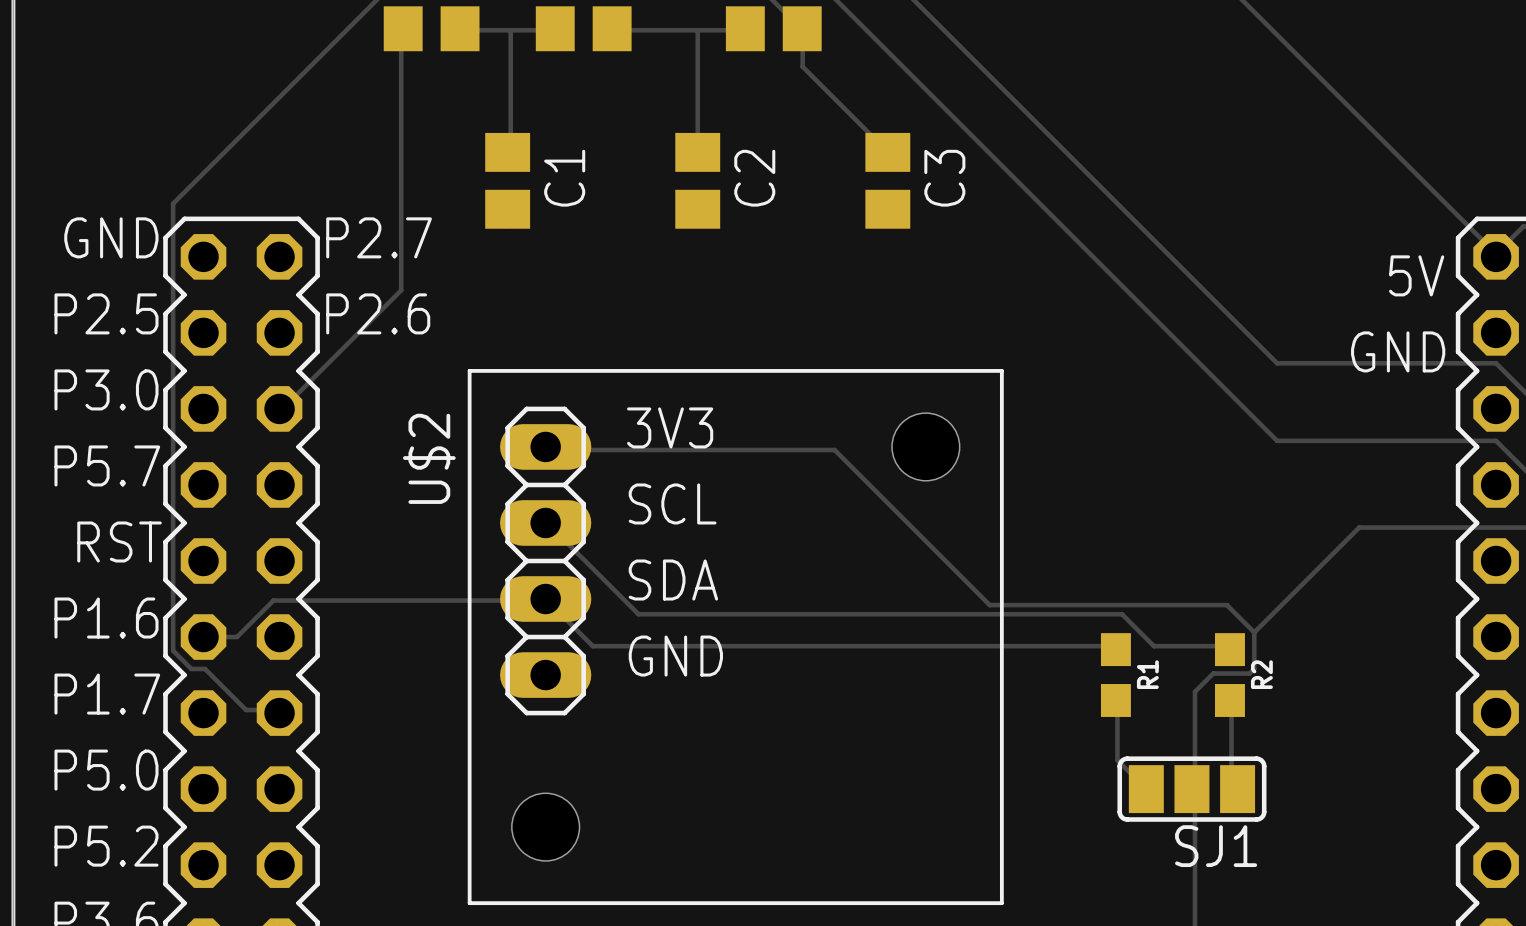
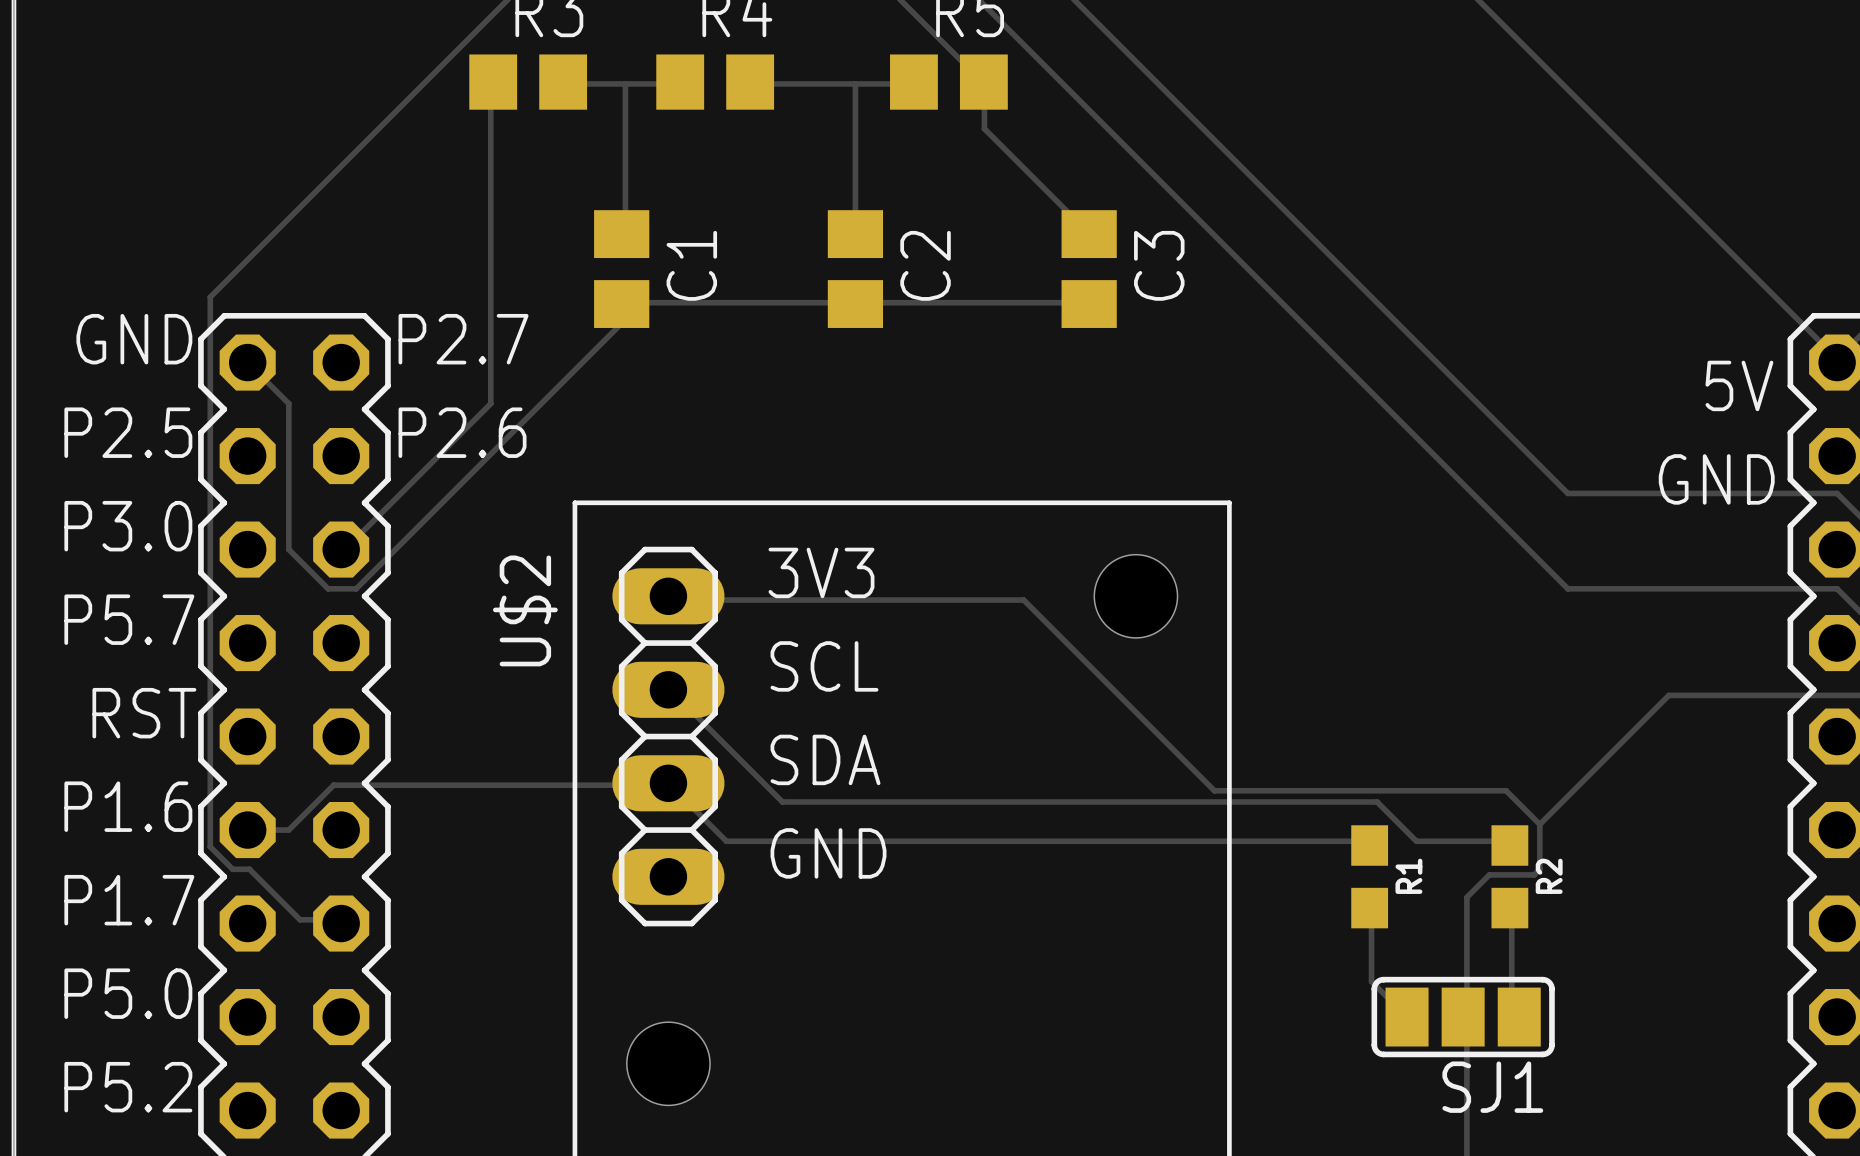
track: none -> (625, 302) (1085, 302)
track: none -> (619, 325) (356, 588) (328, 588) (288, 549) (288, 403) (247, 362)

